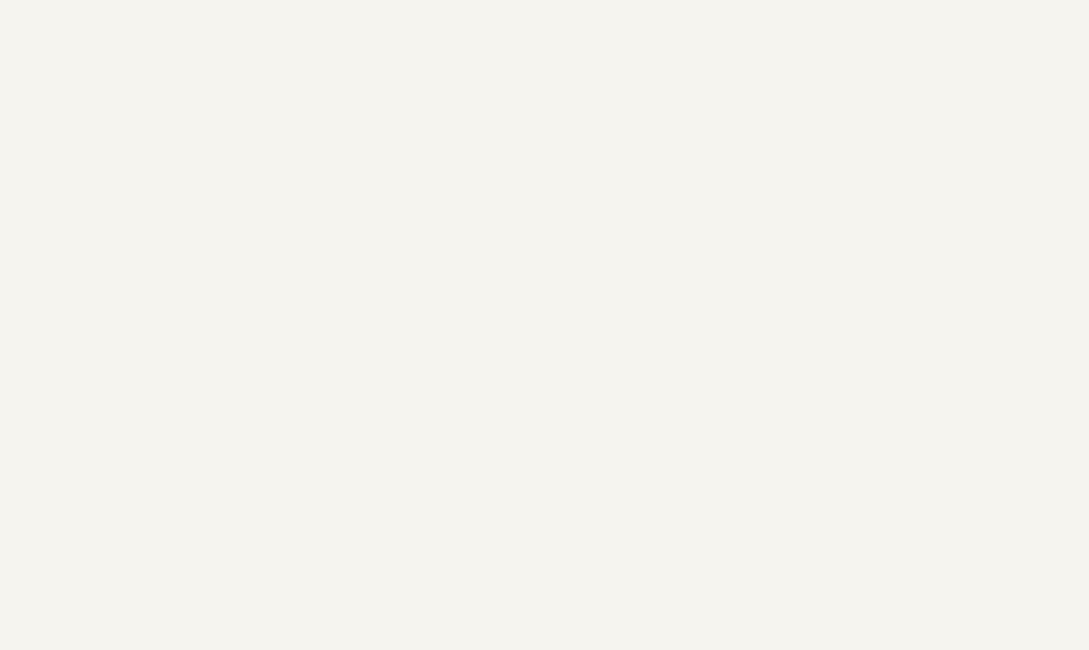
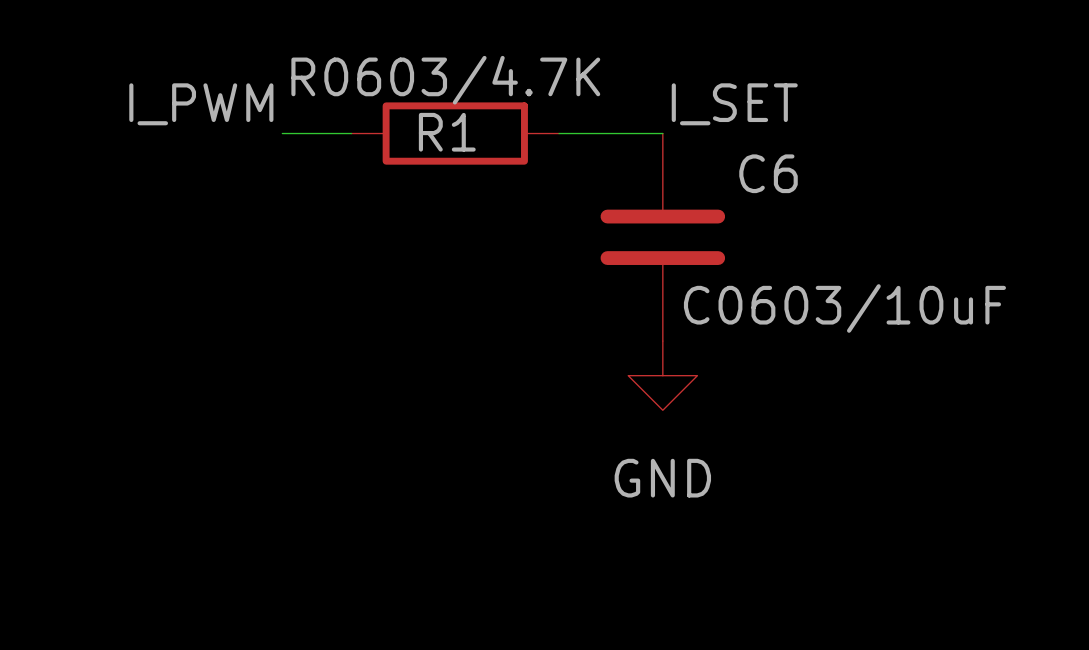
label: none -> I_PWM (201, 104)
label: none -> I_SET (734, 104)
wire: none -> (282, 133) (351, 133)
R1: none -> R0603/4.7K (455, 133)
wire: none -> (559, 133) (662, 133)
C6: none -> C0603/10uF (662, 237)
power symbol: none -> GND (662, 375)

